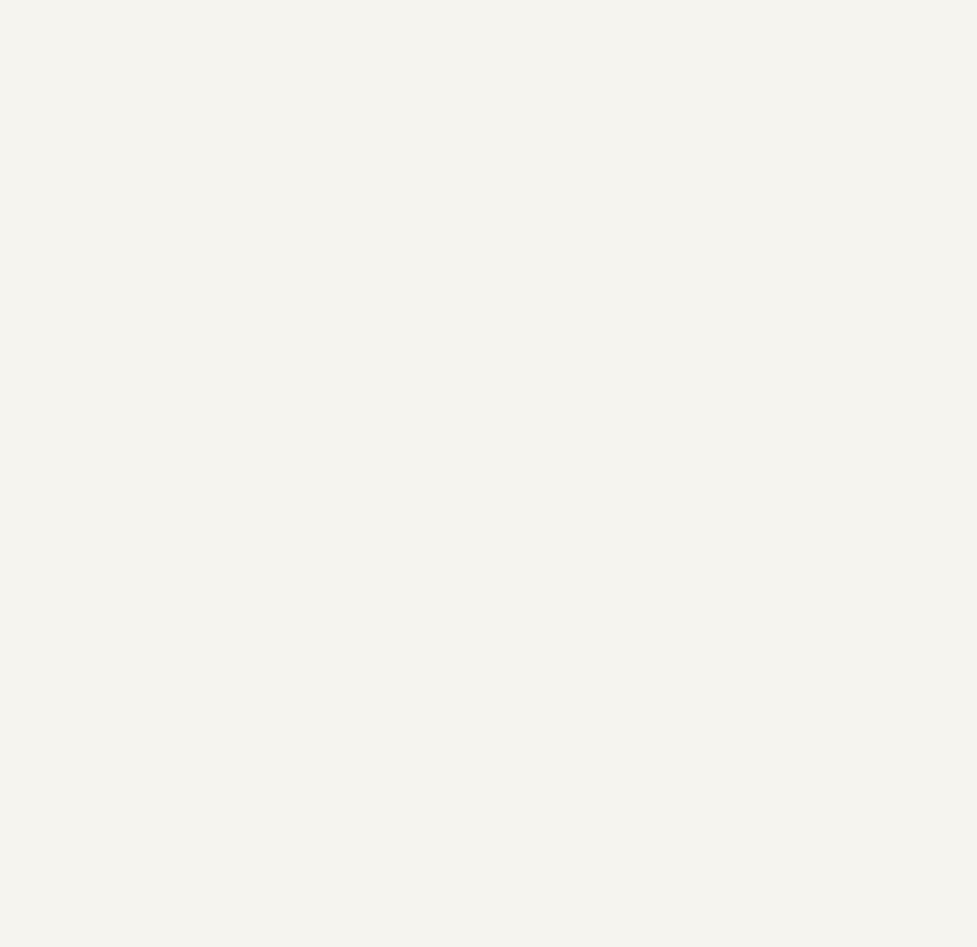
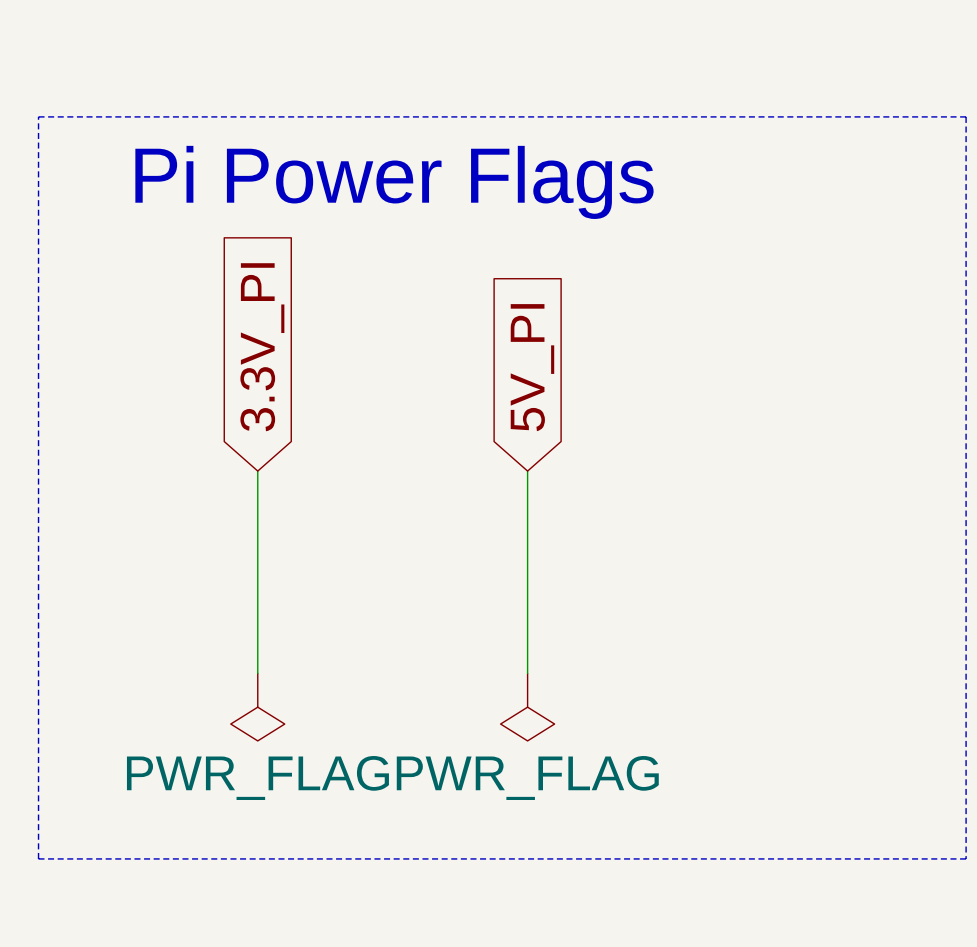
line: none -> (38, 116) (966, 116) (966, 858) (38, 858) (38, 116)
text: none -> Pi Power Flags (394, 182)
global label: none -> 3.3V_PI (262, 347)
global label: none -> 5V_PI (532, 367)
wire: none -> (257, 471) (257, 673)
wire: none -> (527, 471) (527, 673)
power symbol: none -> PWR_FLAG (257, 707)
power symbol: none -> PWR_FLAG (527, 707)

